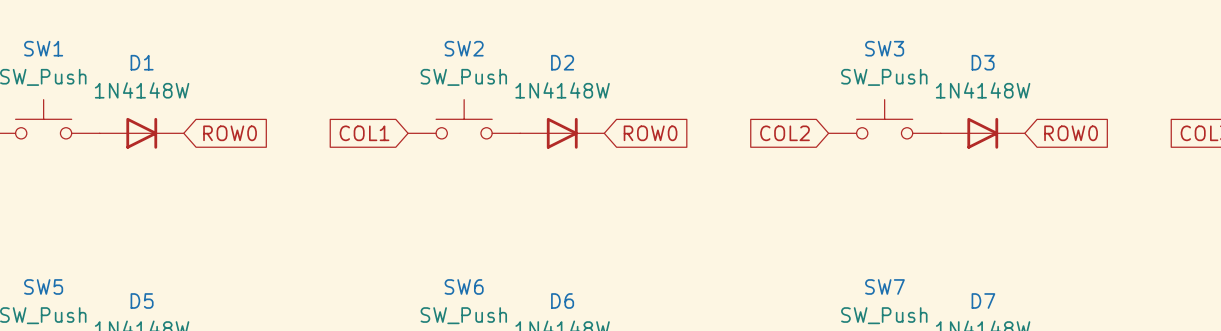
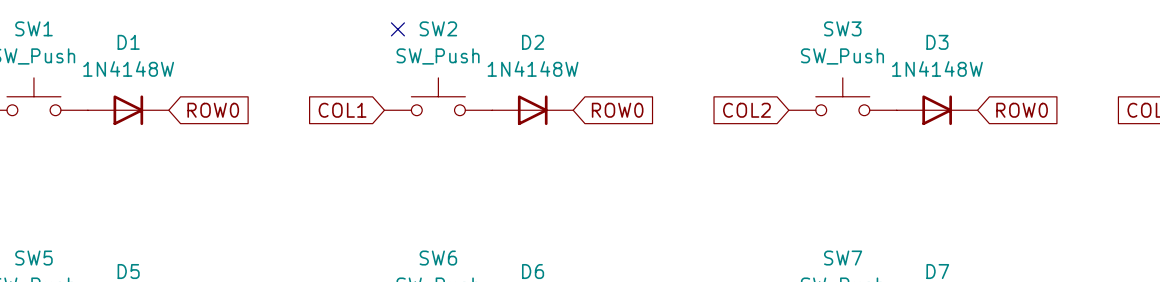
no-connect mark: none -> (397, 29)

